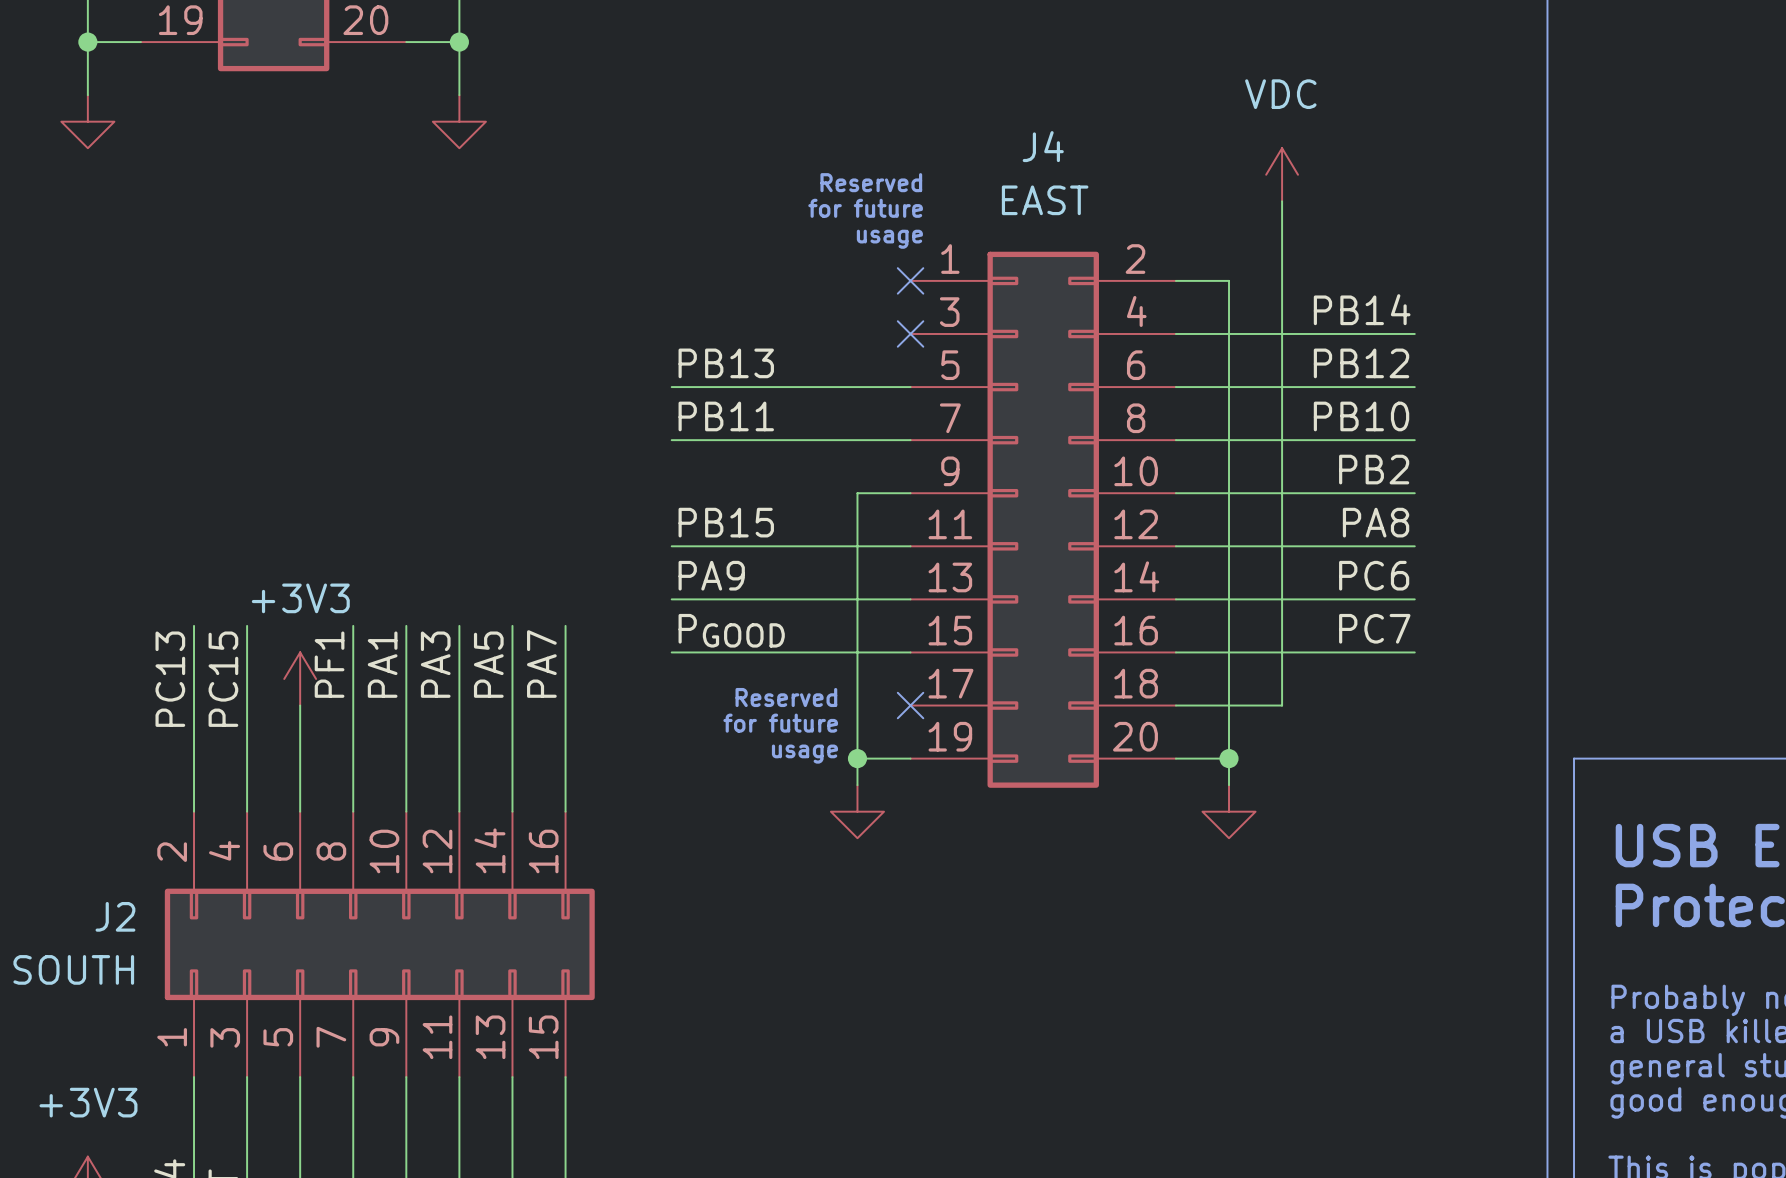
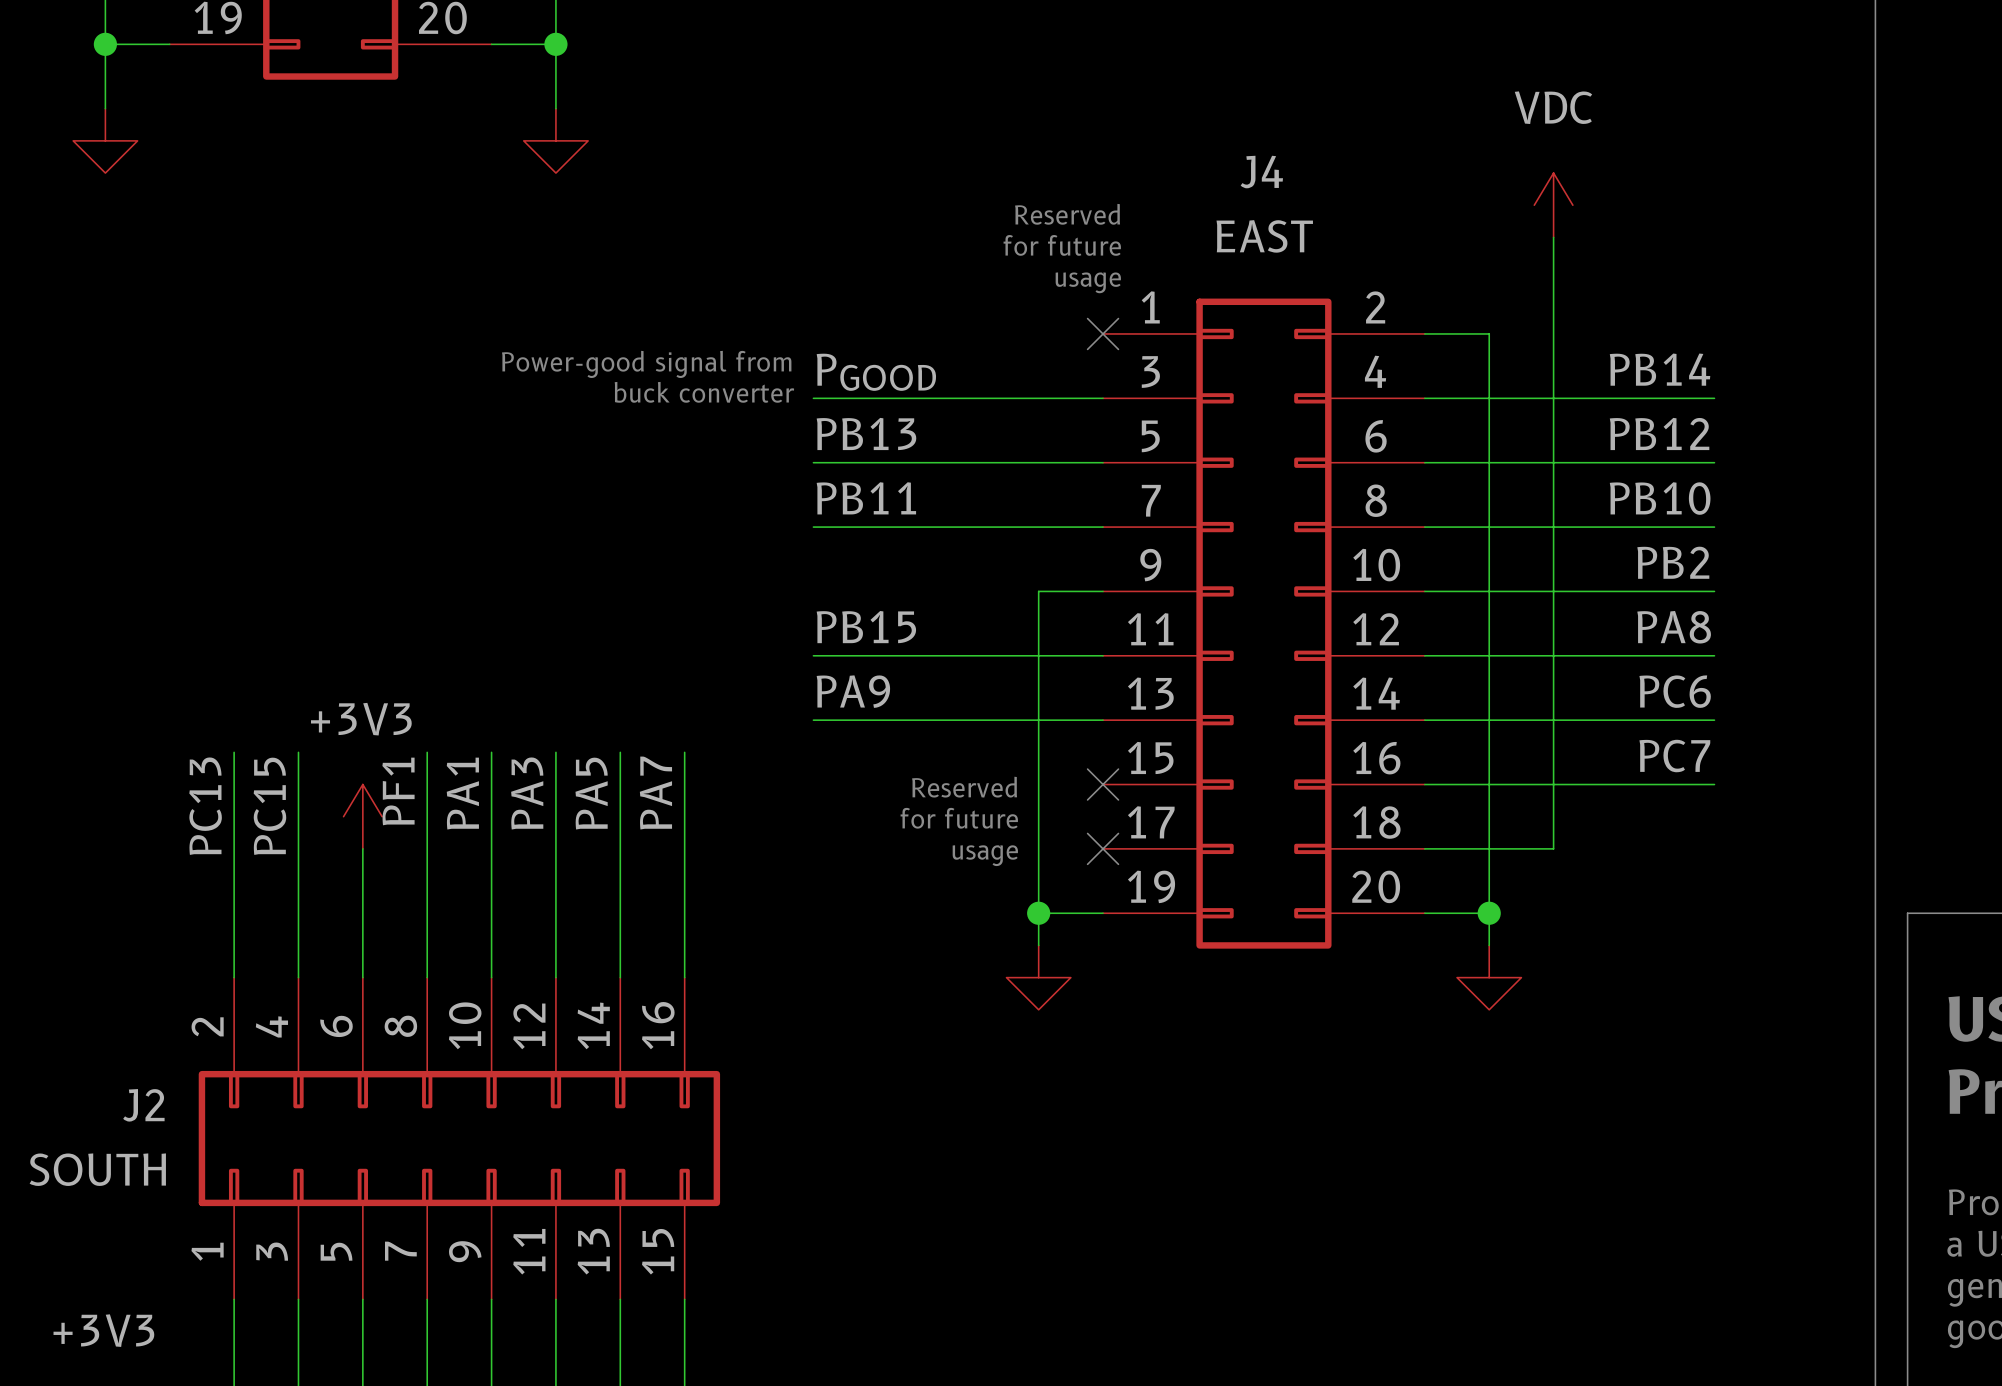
text: none -> Power-good signal from (646, 364)
text: none -> buck converter (704, 392)
no-connect mark: (910, 333) -> none
label position: PGOOD (731, 630) -> PGOOD (876, 372)
wire: (671, 652) (910, 652) -> (813, 398) (1103, 398)
no-connect mark: none -> (1103, 784)
text position: Reserved (786, 697) -> Reserved (964, 787)
text position: for future (780, 723) -> for future (959, 818)
text position: usage (804, 754) -> usage (985, 855)

